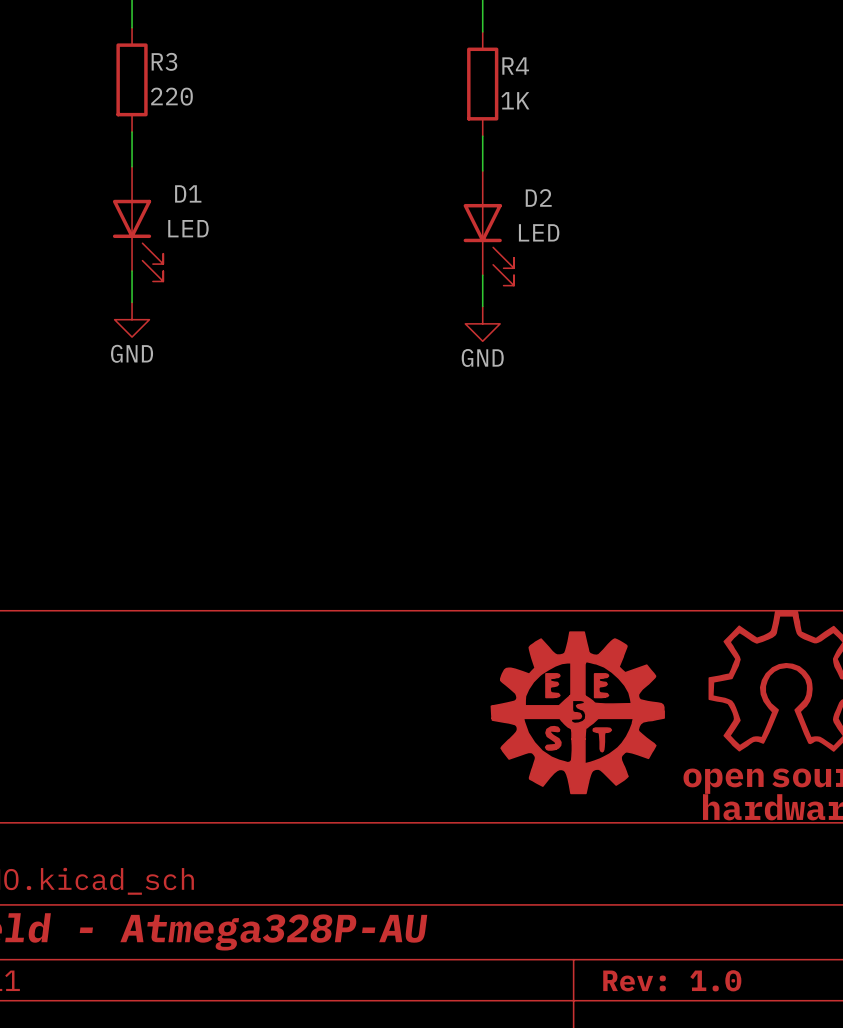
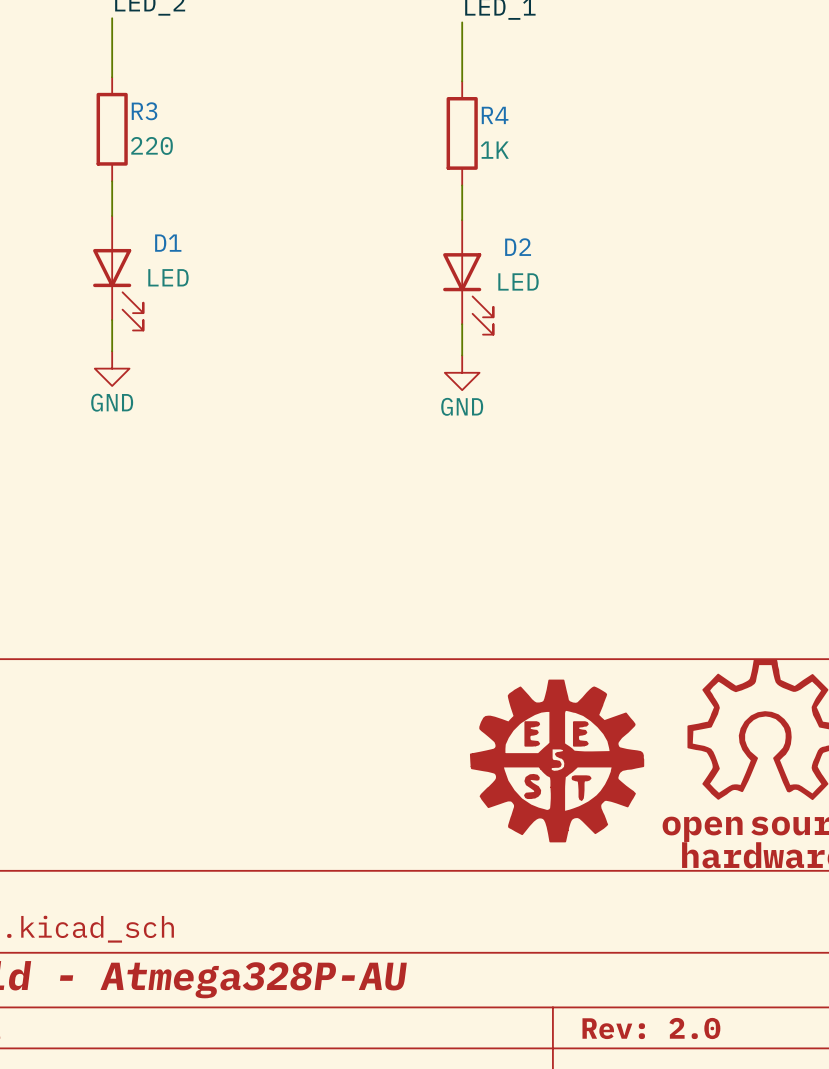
title block: Rev: 1.0 (672, 980) -> Rev: 2.0 (651, 1028)

